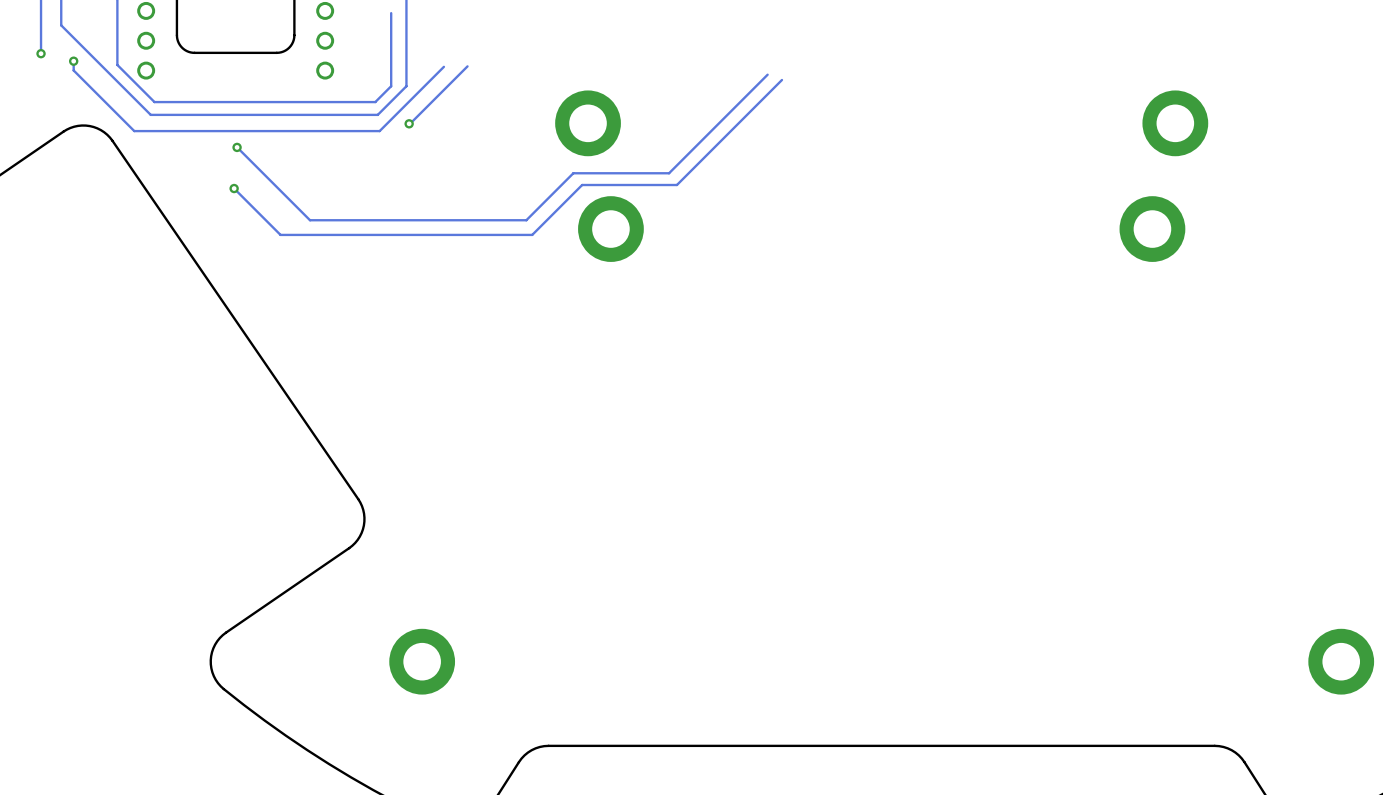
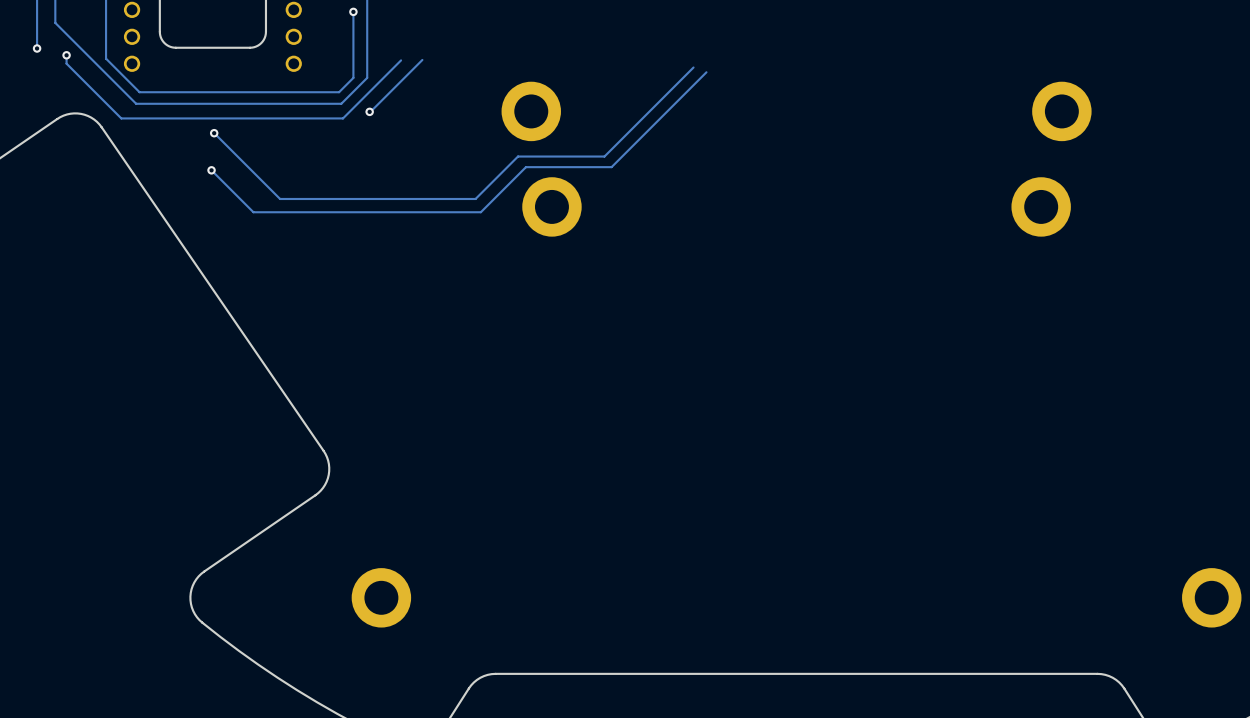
via: none -> (353, 11)

